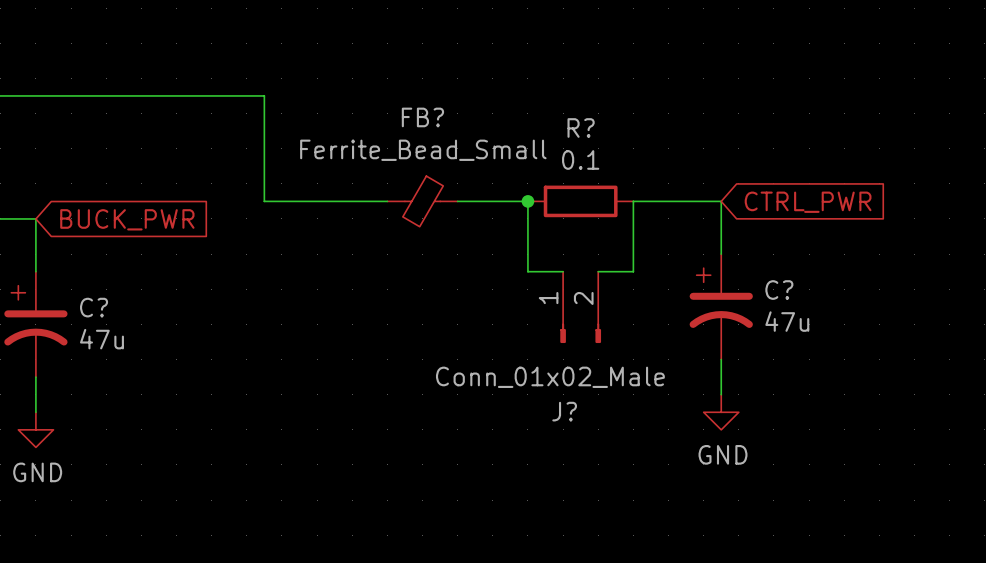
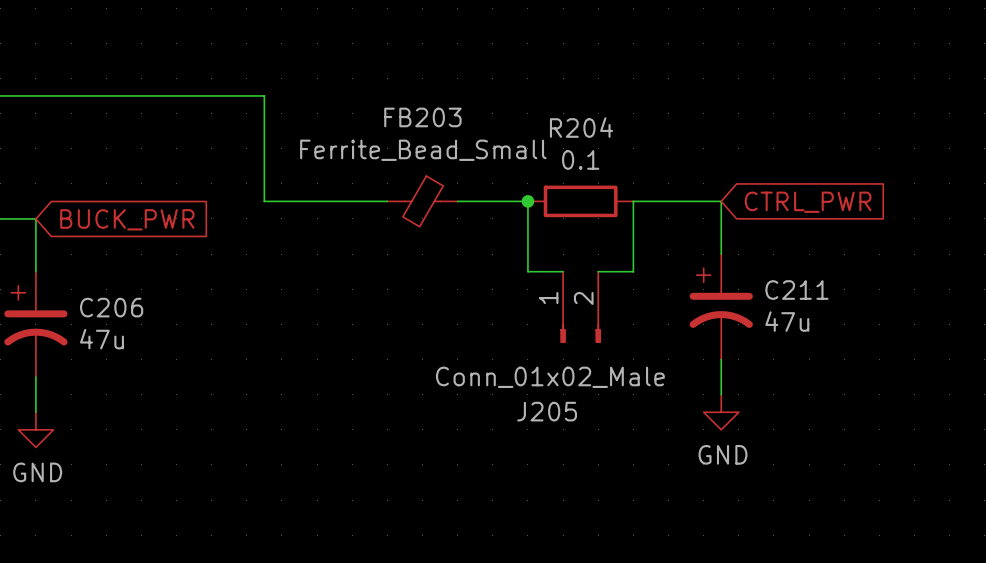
FB? name: FB? (422, 117) -> FB203 (422, 117)
R? name: R? (581, 127) -> R204 (581, 127)
C? name: C? (779, 290) -> C211 (796, 290)
C? name: C? (94, 307) -> C206 (111, 307)
J? name: J? (564, 411) -> J205 (547, 411)

